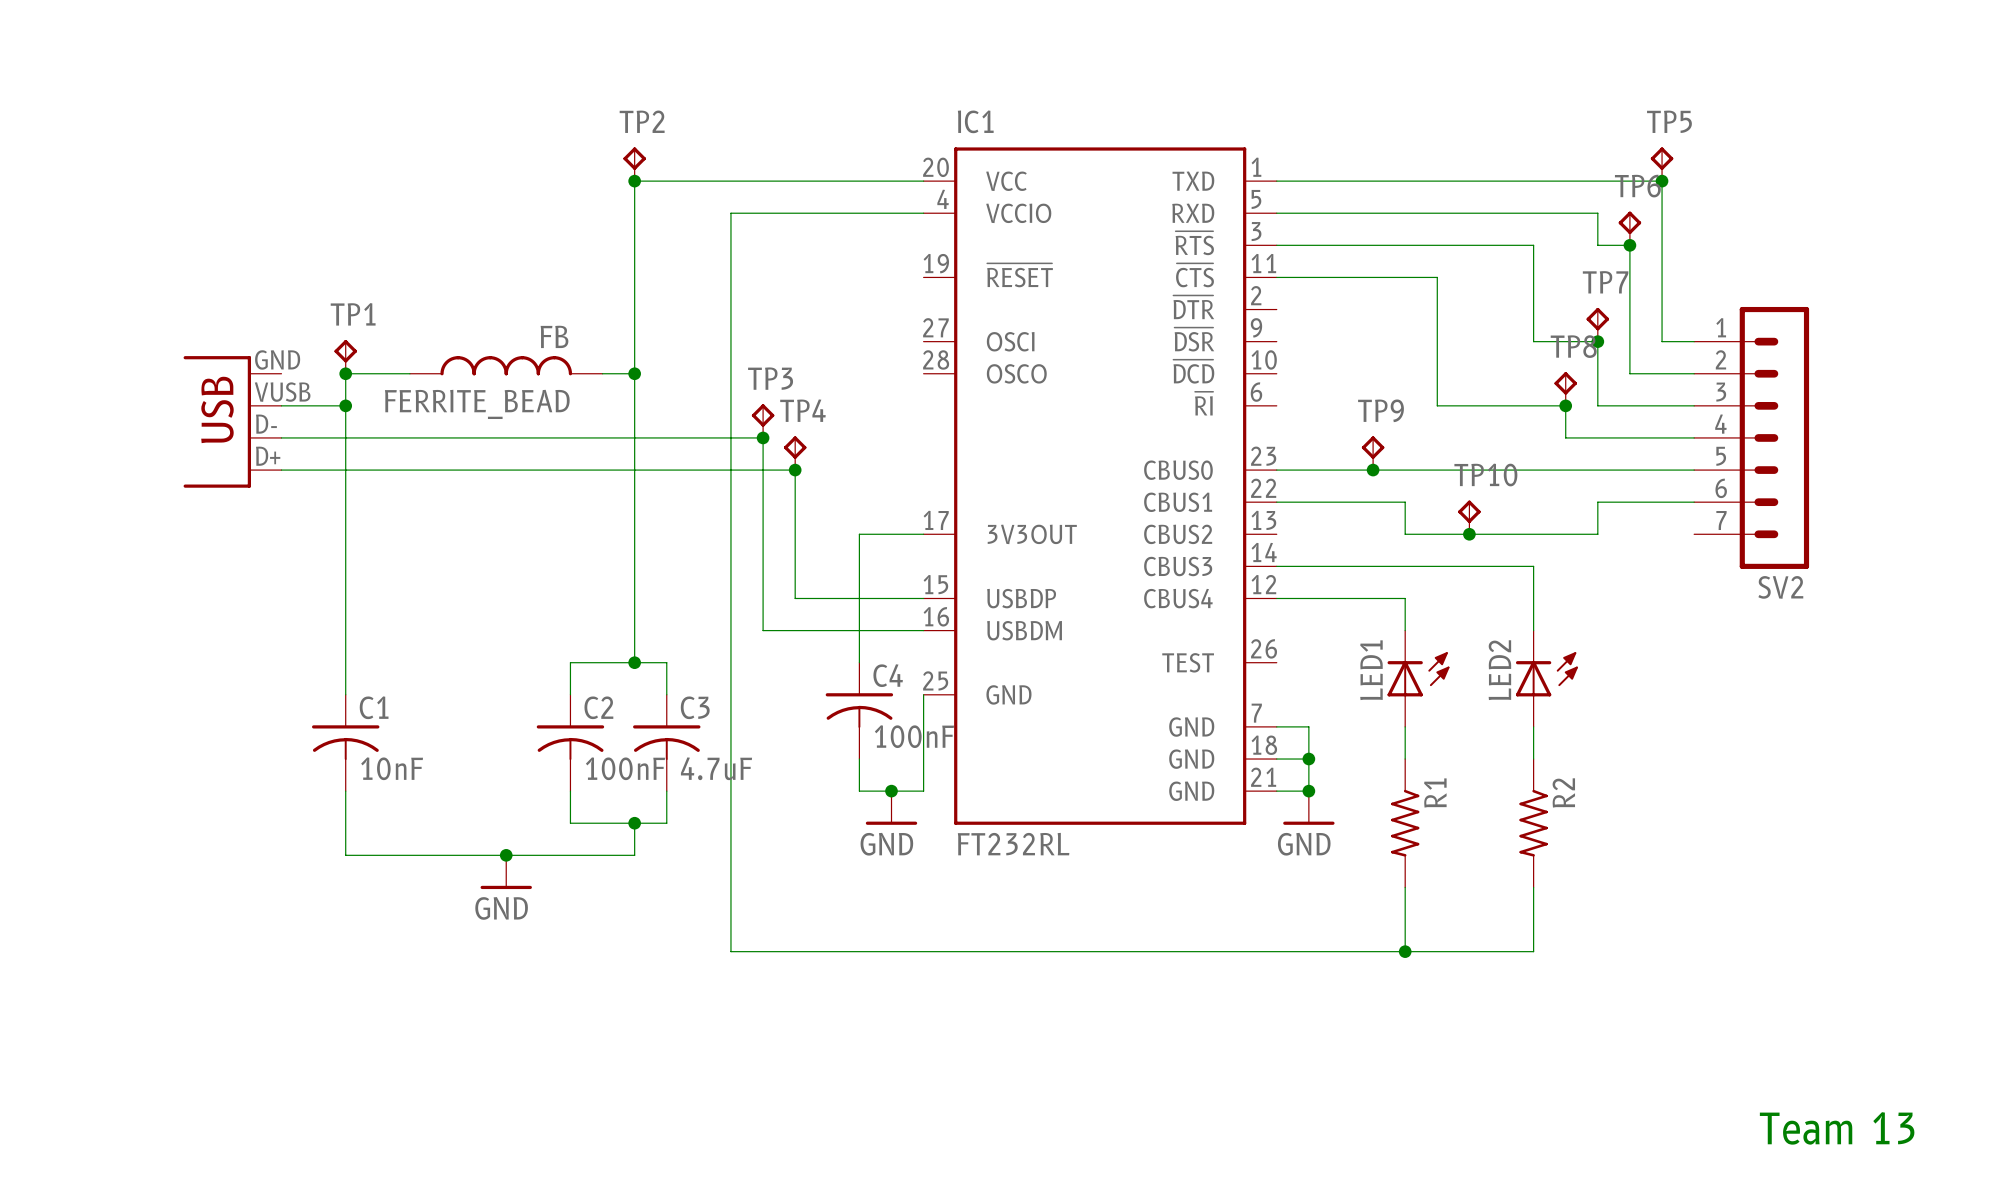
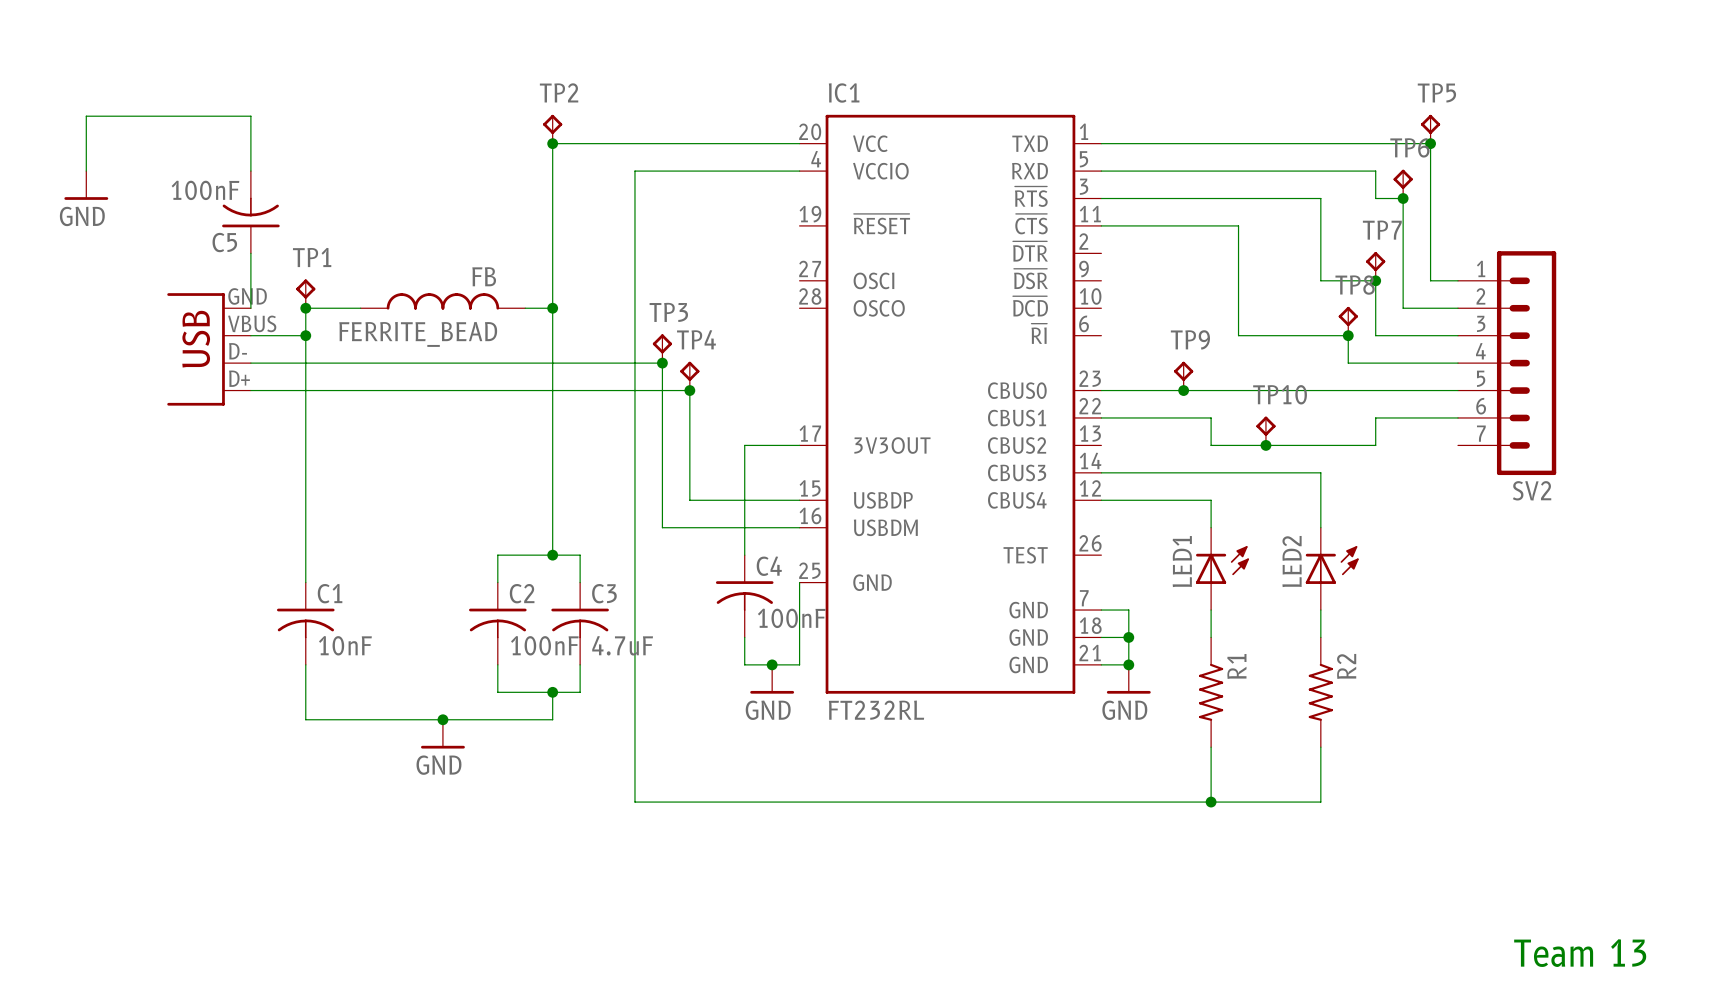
wire: none -> (86, 171) (86, 116) (250, 116) (250, 171)
power symbol: none -> GND (86, 185)
C5: none -> 100nF (250, 212)
wire: none -> (250, 253) (250, 308)
part pin number: VUSB (282, 392) -> VBUS (252, 323)

